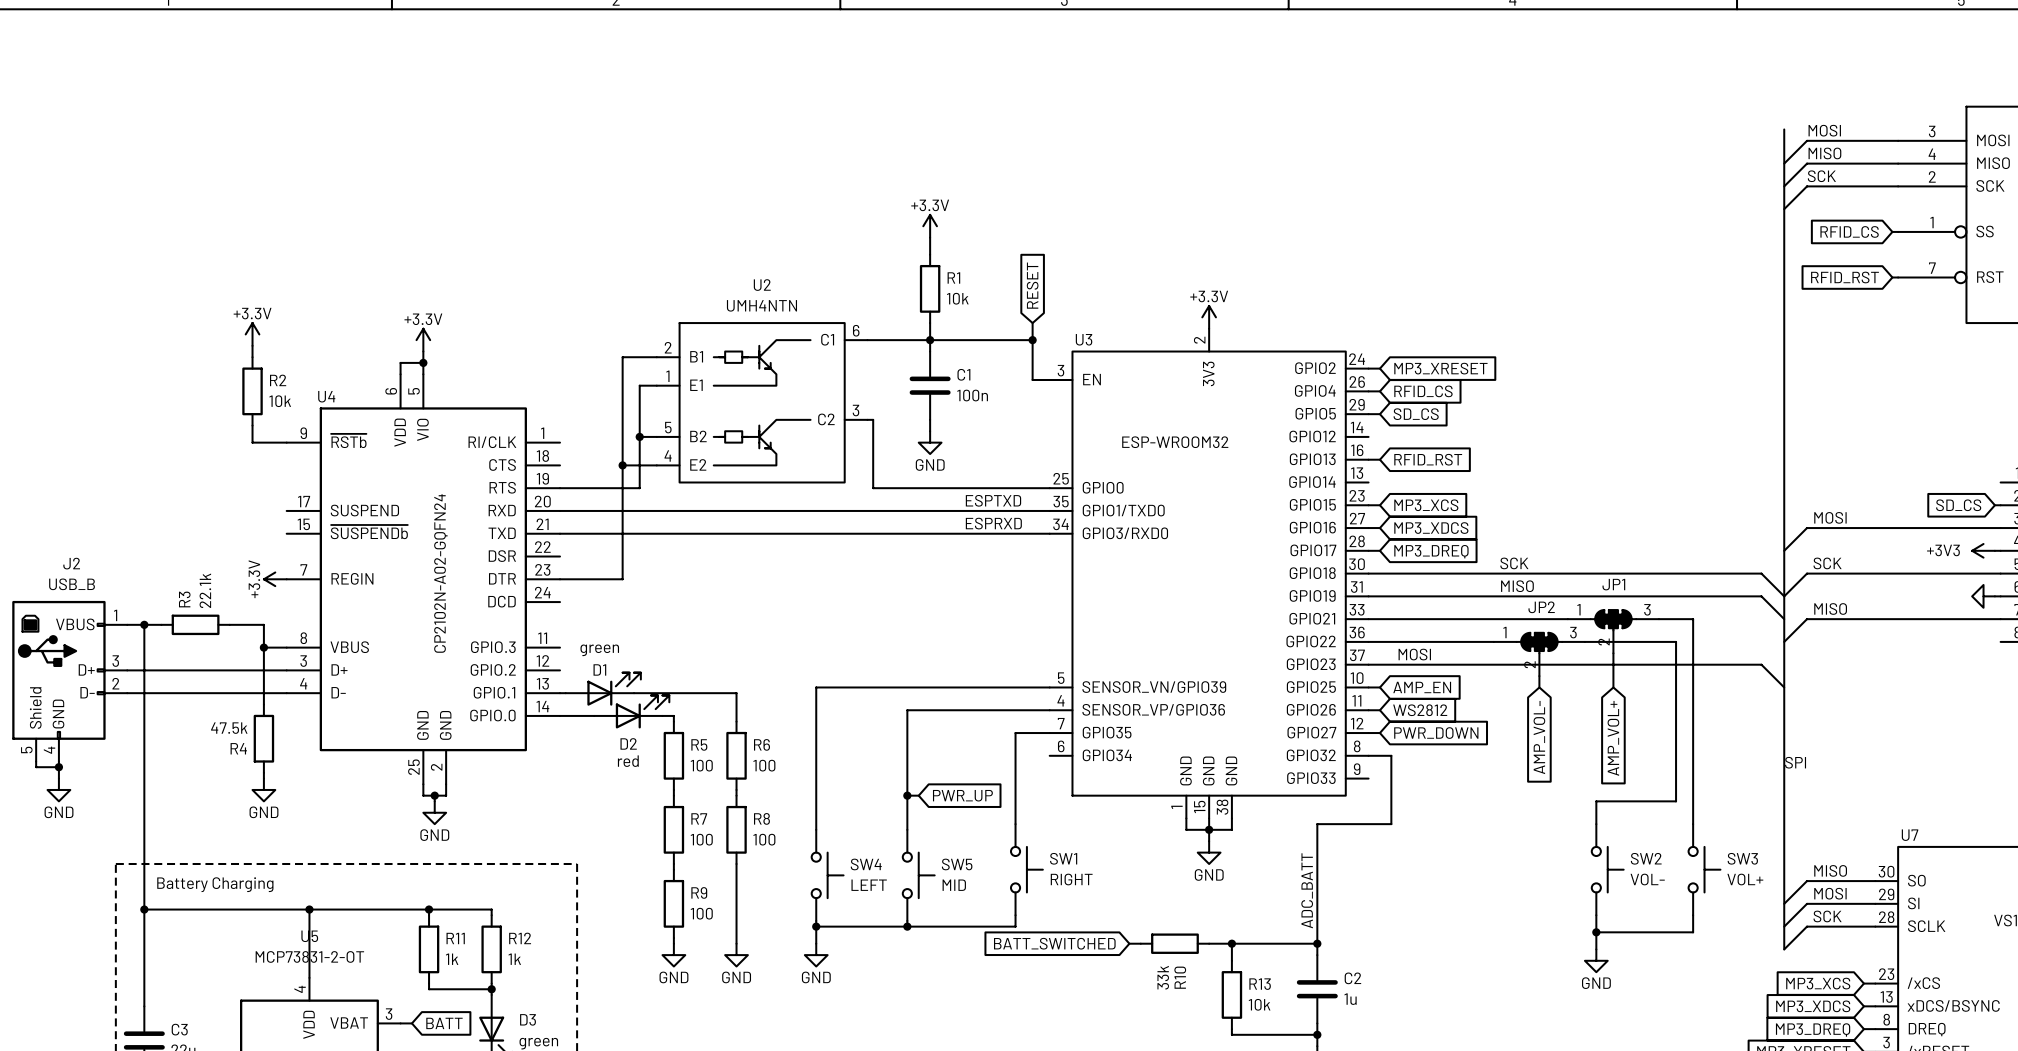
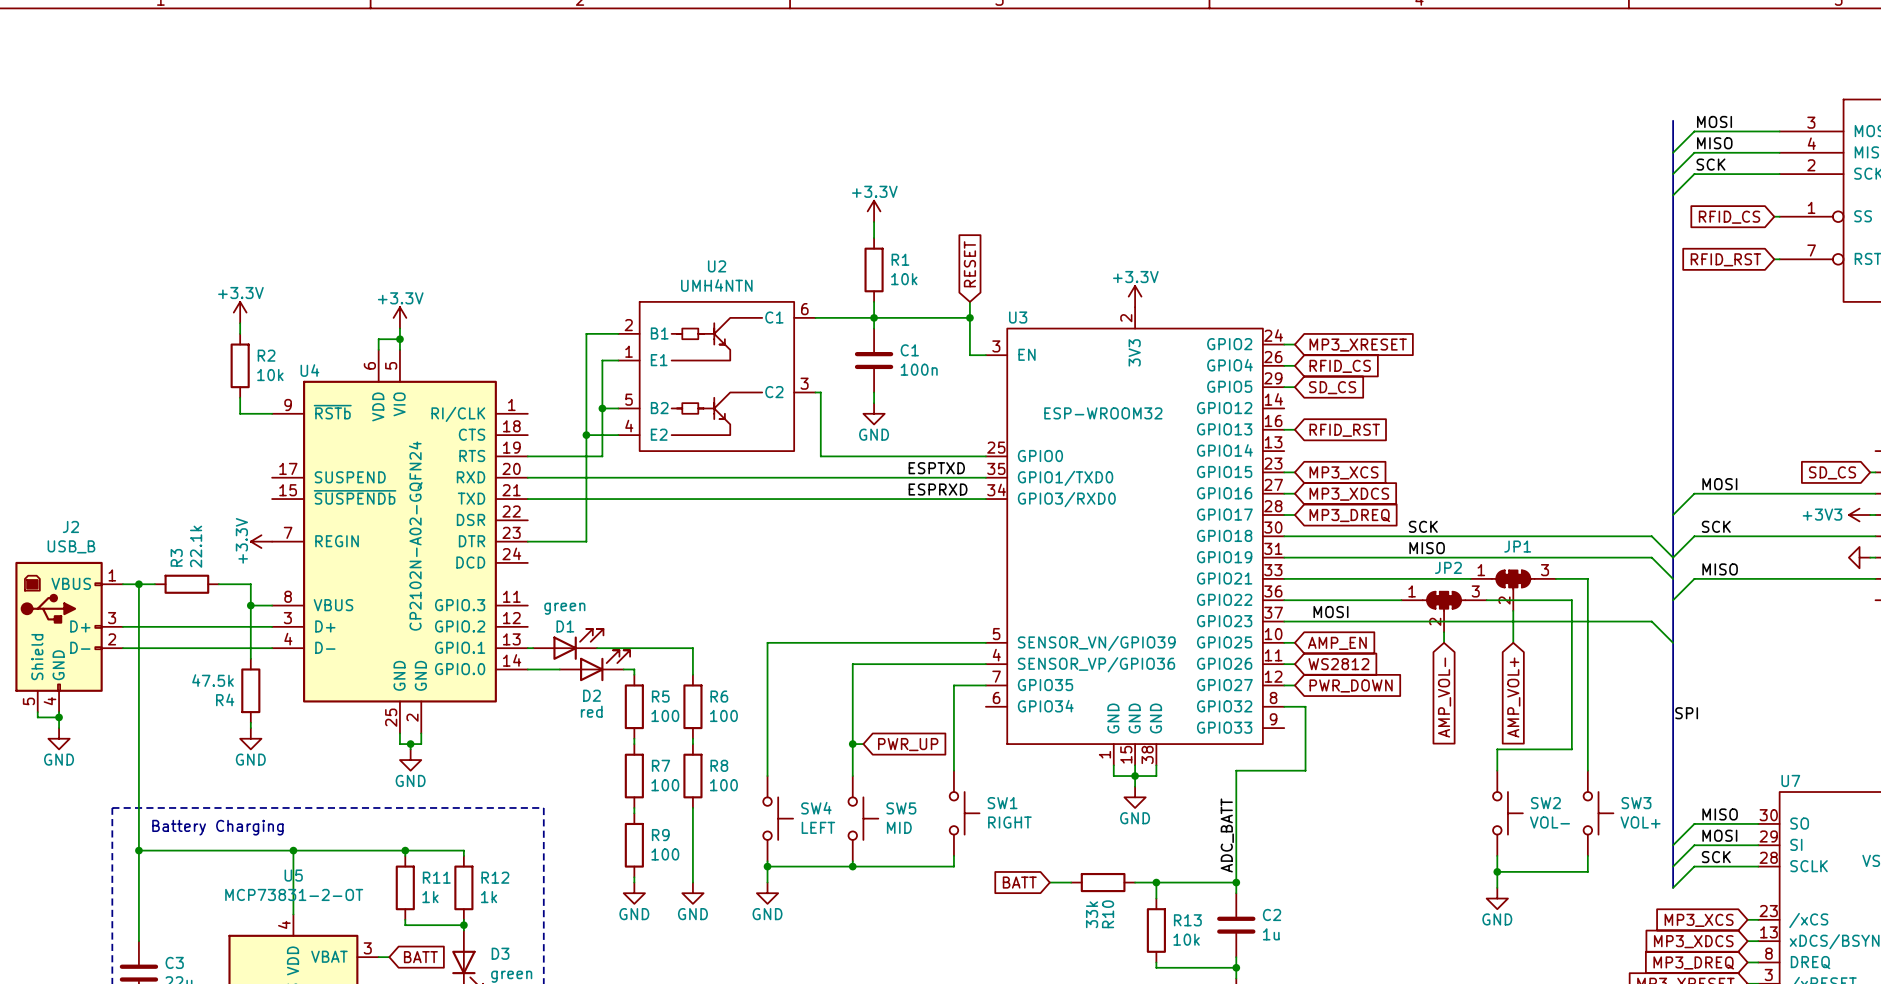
global label: BATT_SWITCHED (1054, 943) -> none
global label: none -> BATT (1019, 882)
wire: none -> (1049, 882) (1060, 882)

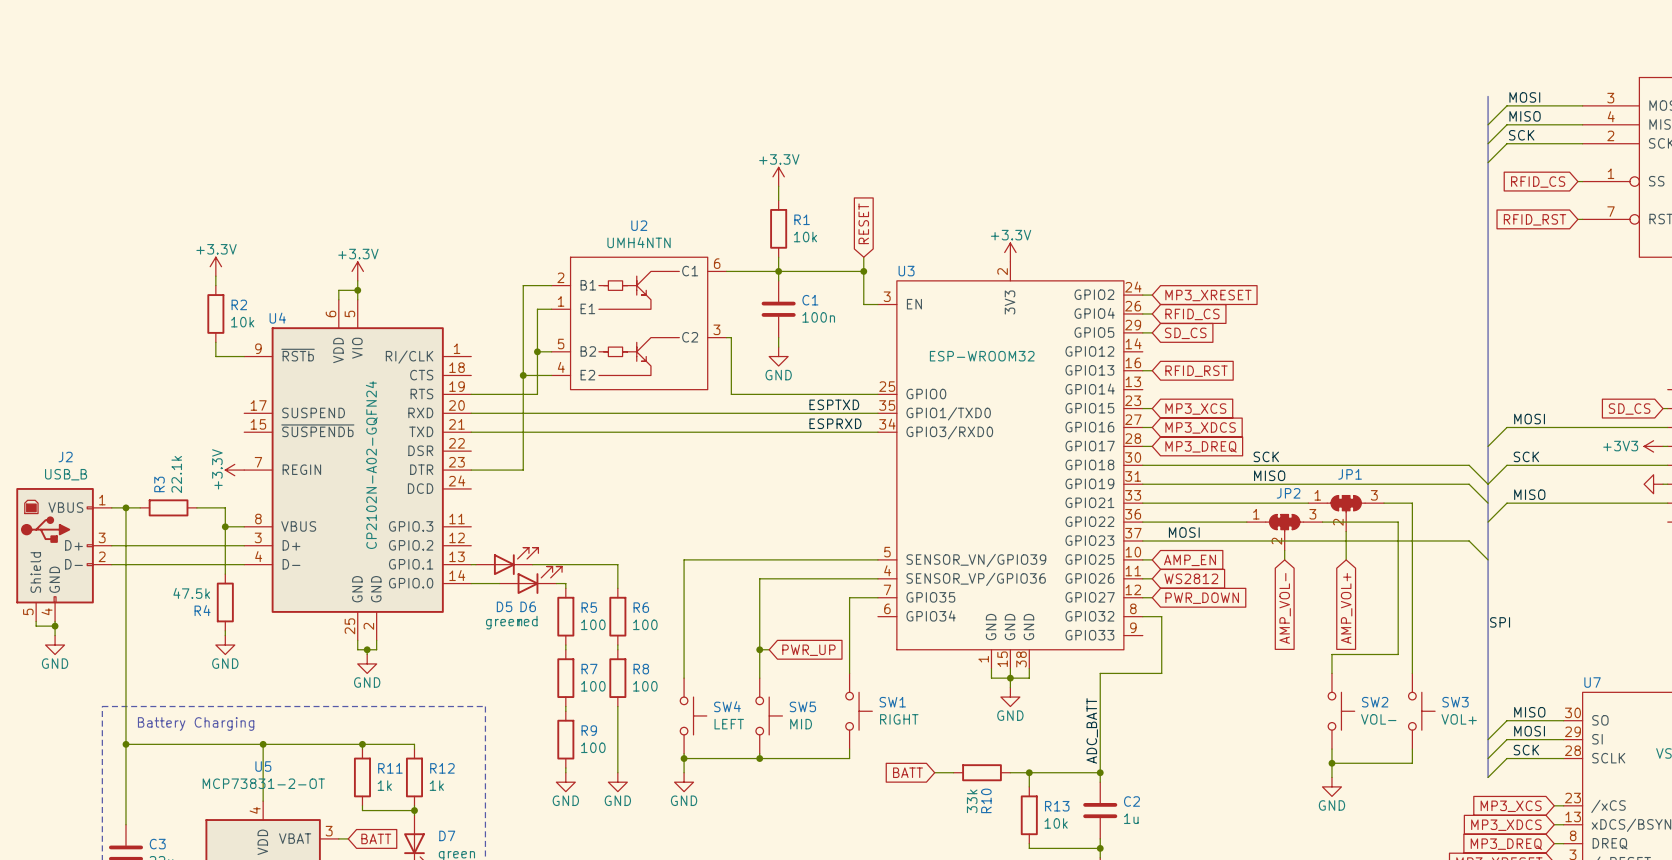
D1 value position: green (564, 608) -> green (504, 624)
D1 name: D1 (565, 626) -> D5 (504, 606)
D2 name: D2 (591, 695) -> D6 (528, 606)
D3 name: D3 (500, 953) -> D7 (447, 835)

